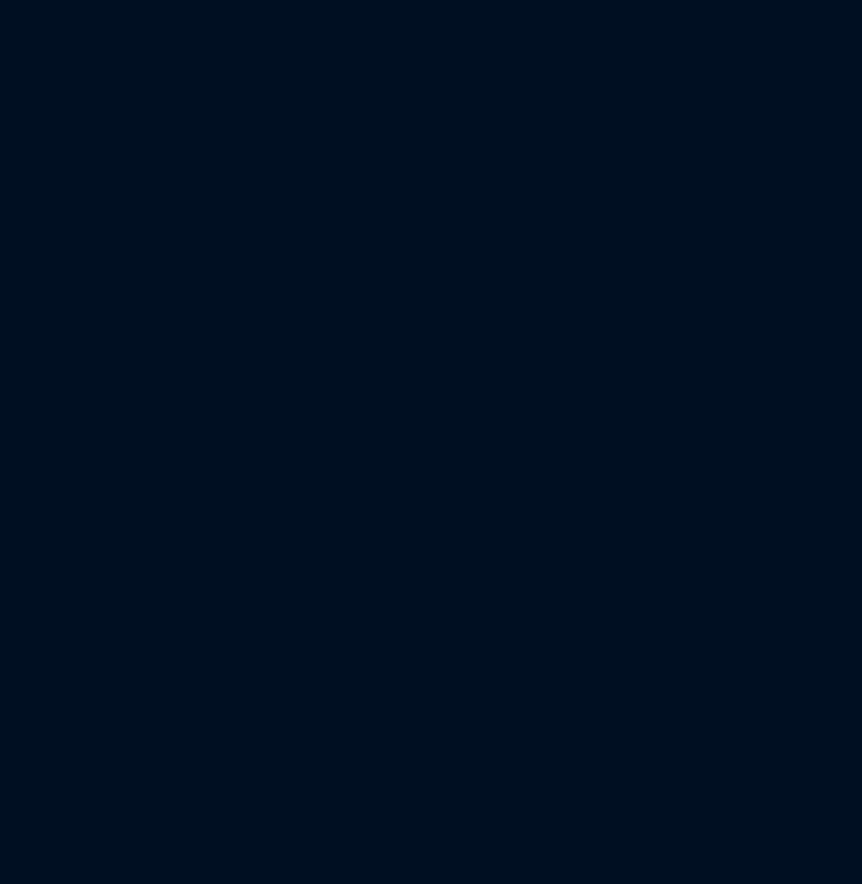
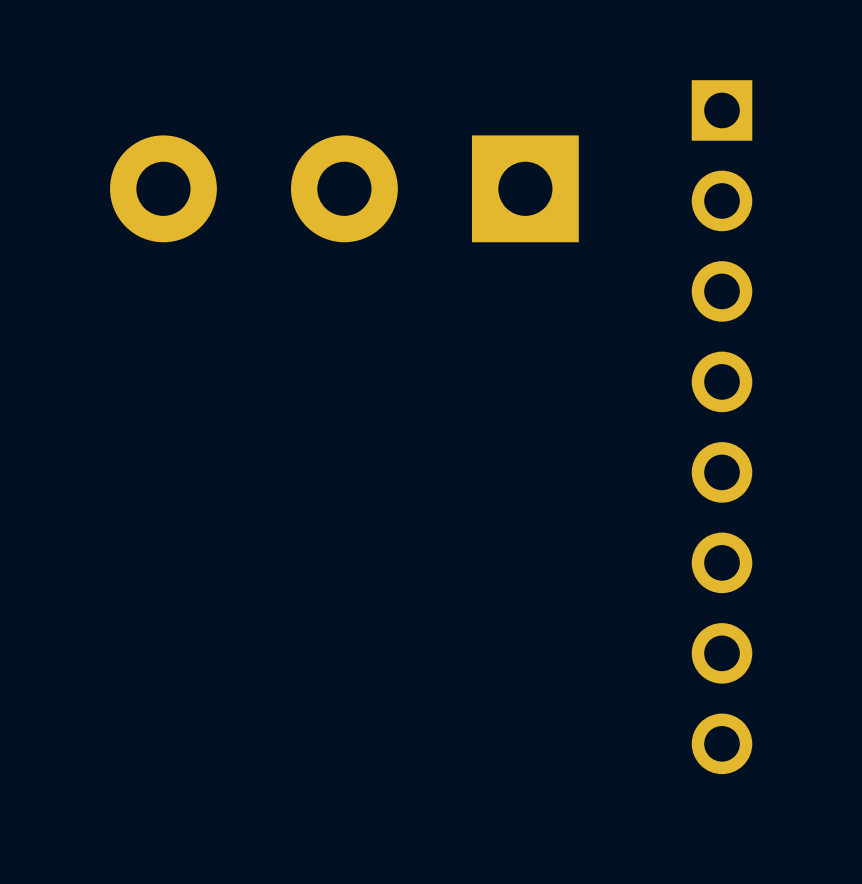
part: none -> (344, 188)
part: none -> (722, 427)

